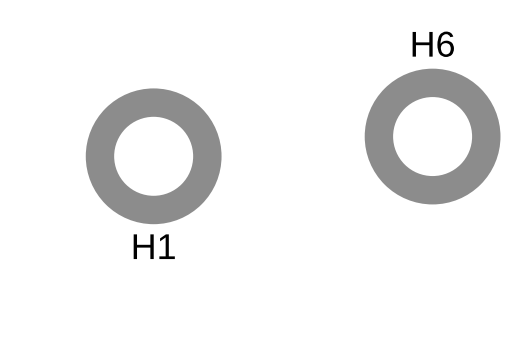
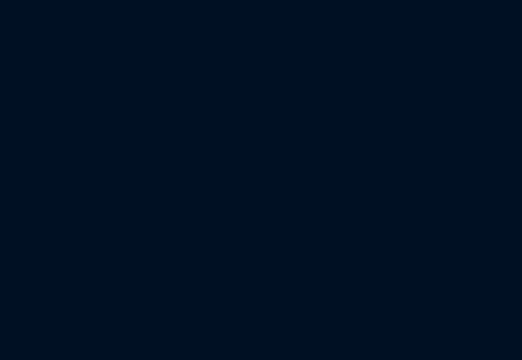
H6: (432, 136) -> none
H1: (153, 156) -> none

